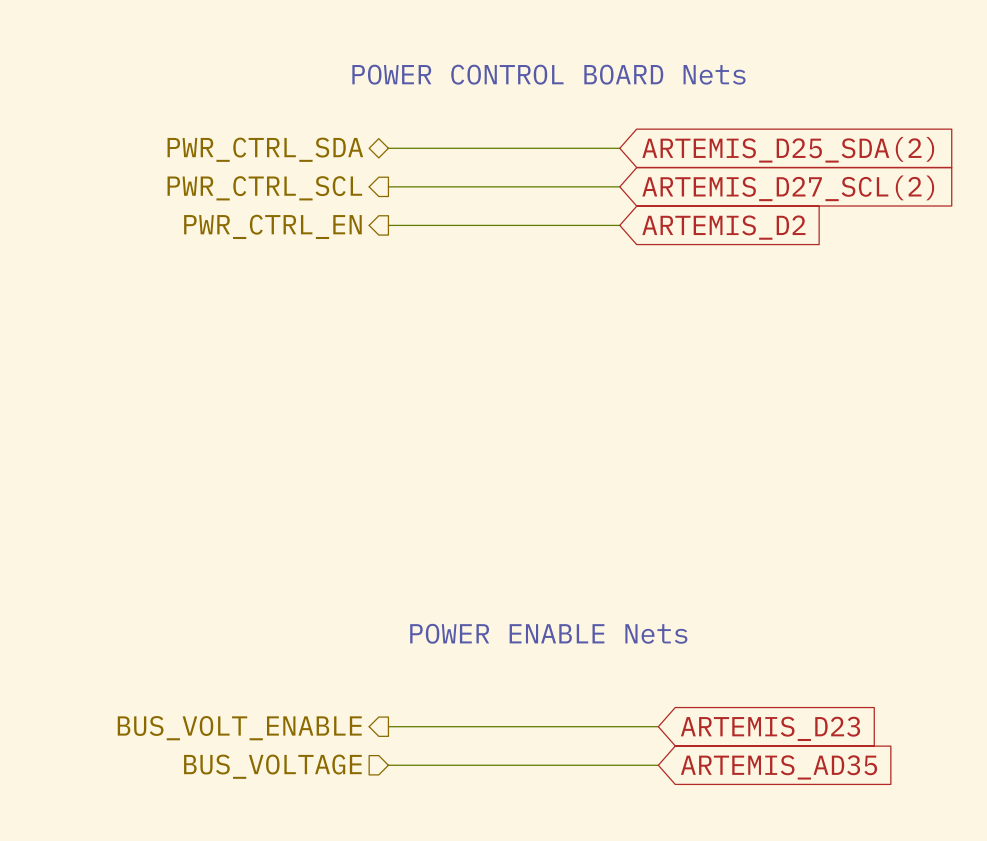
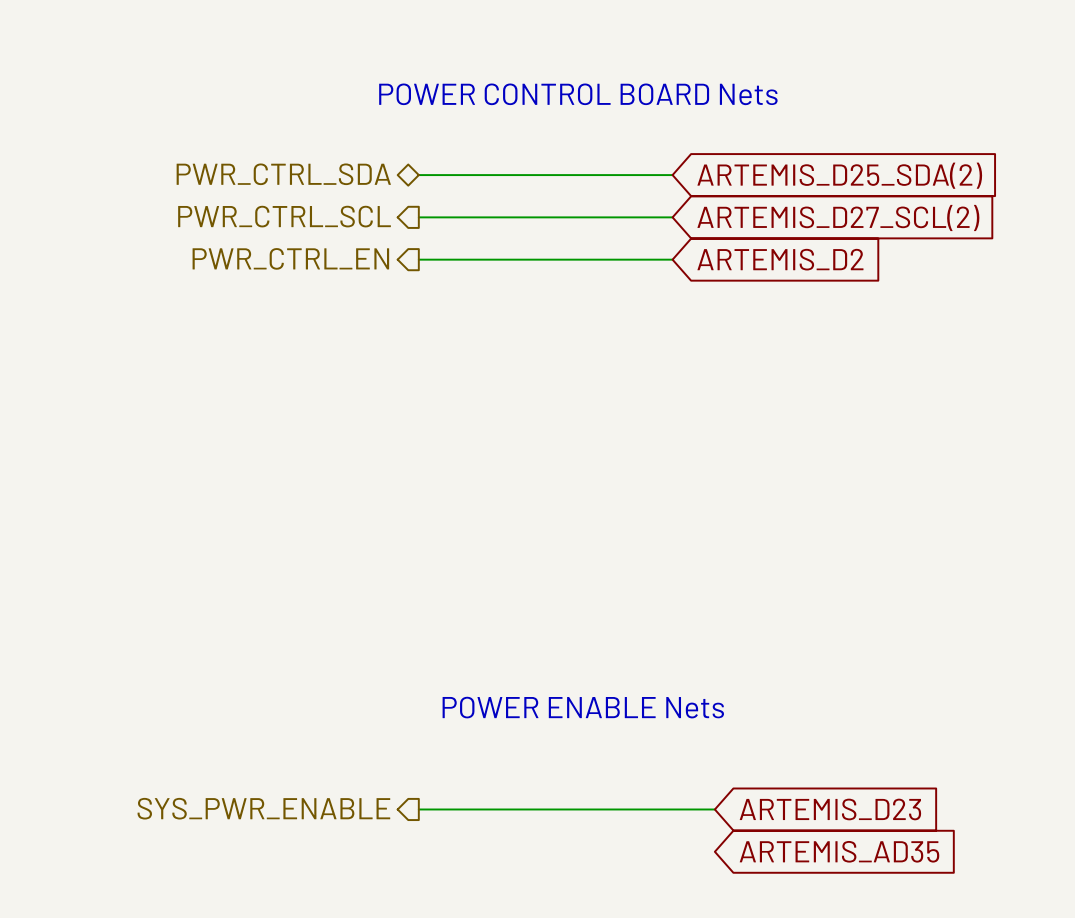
hierarchical label: BUS_VOLT_ENABLE (239, 728) -> SYS_PWR_ENABLE (263, 808)
wire: (388, 765) (658, 765) -> none
hierarchical label: BUS_VOLTAGE (272, 766) -> none

